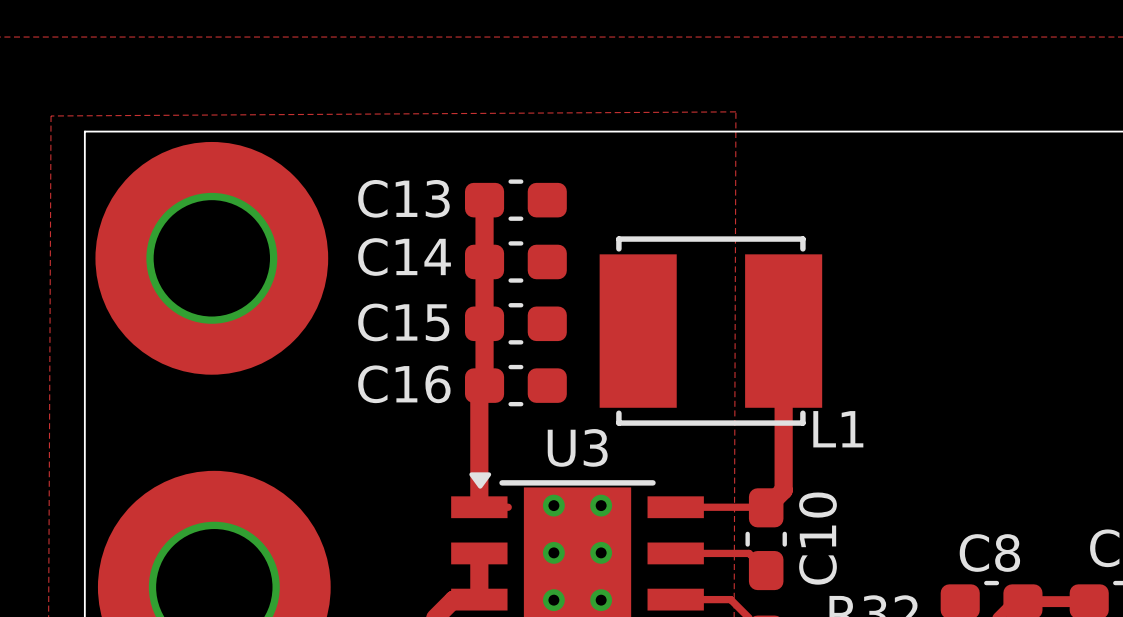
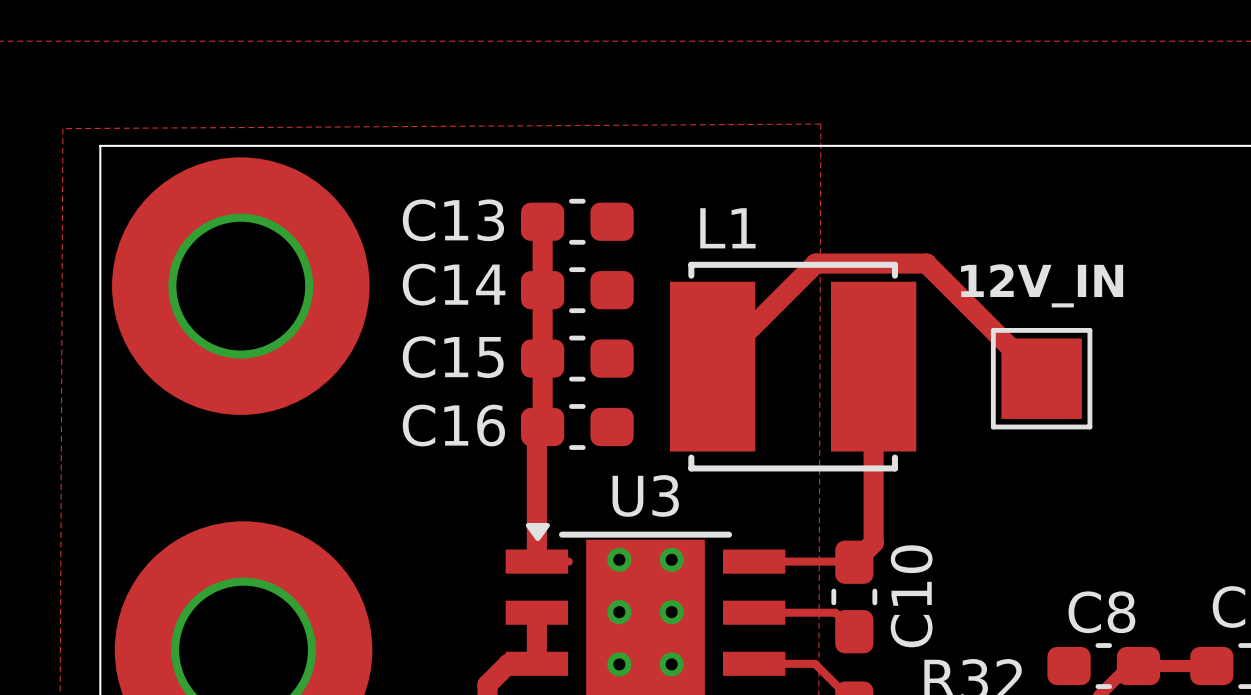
track: none -> (712, 366) (815, 263) (926, 263) (1041, 378)
part: none -> 12V_IN (1041, 378)
L1 name position: L1 (838, 429) -> L1 (727, 228)

